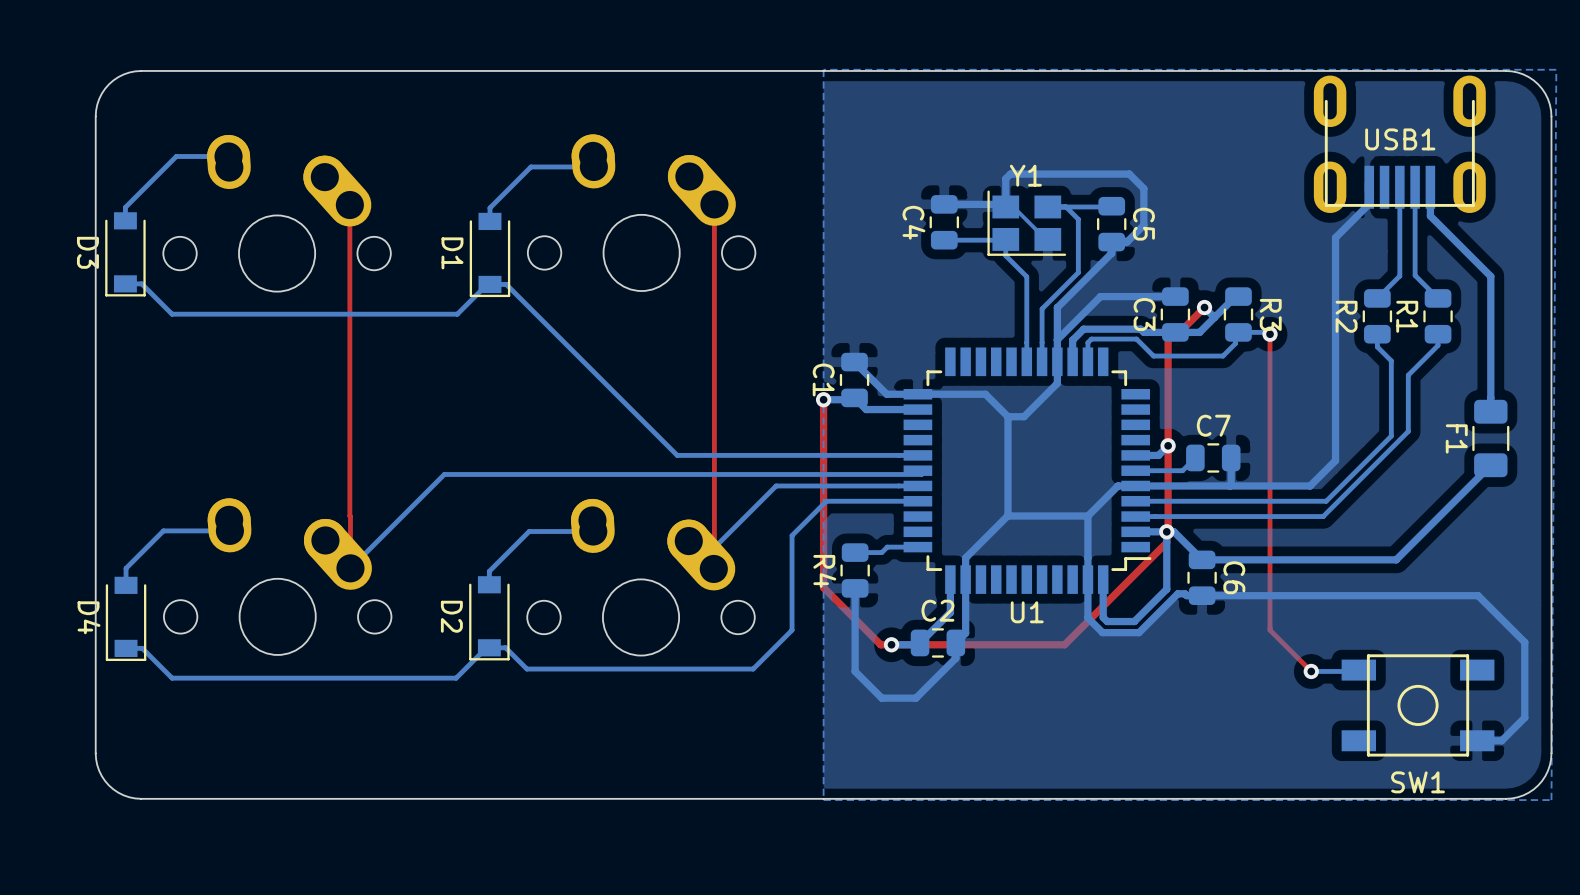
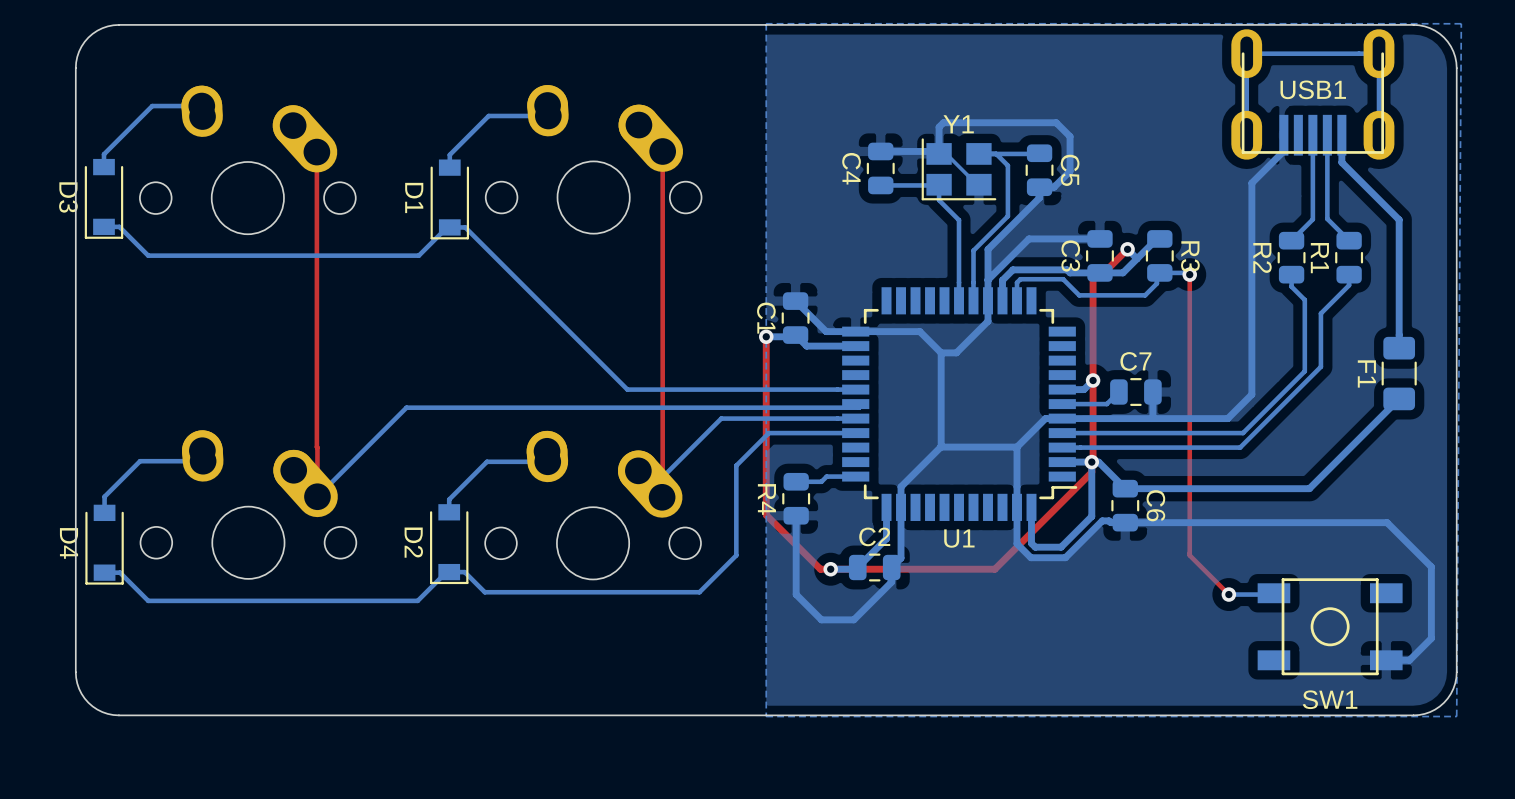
bottom track: none -> (1379, 135) (1379, 53) (1246, 53) (1246, 135)

